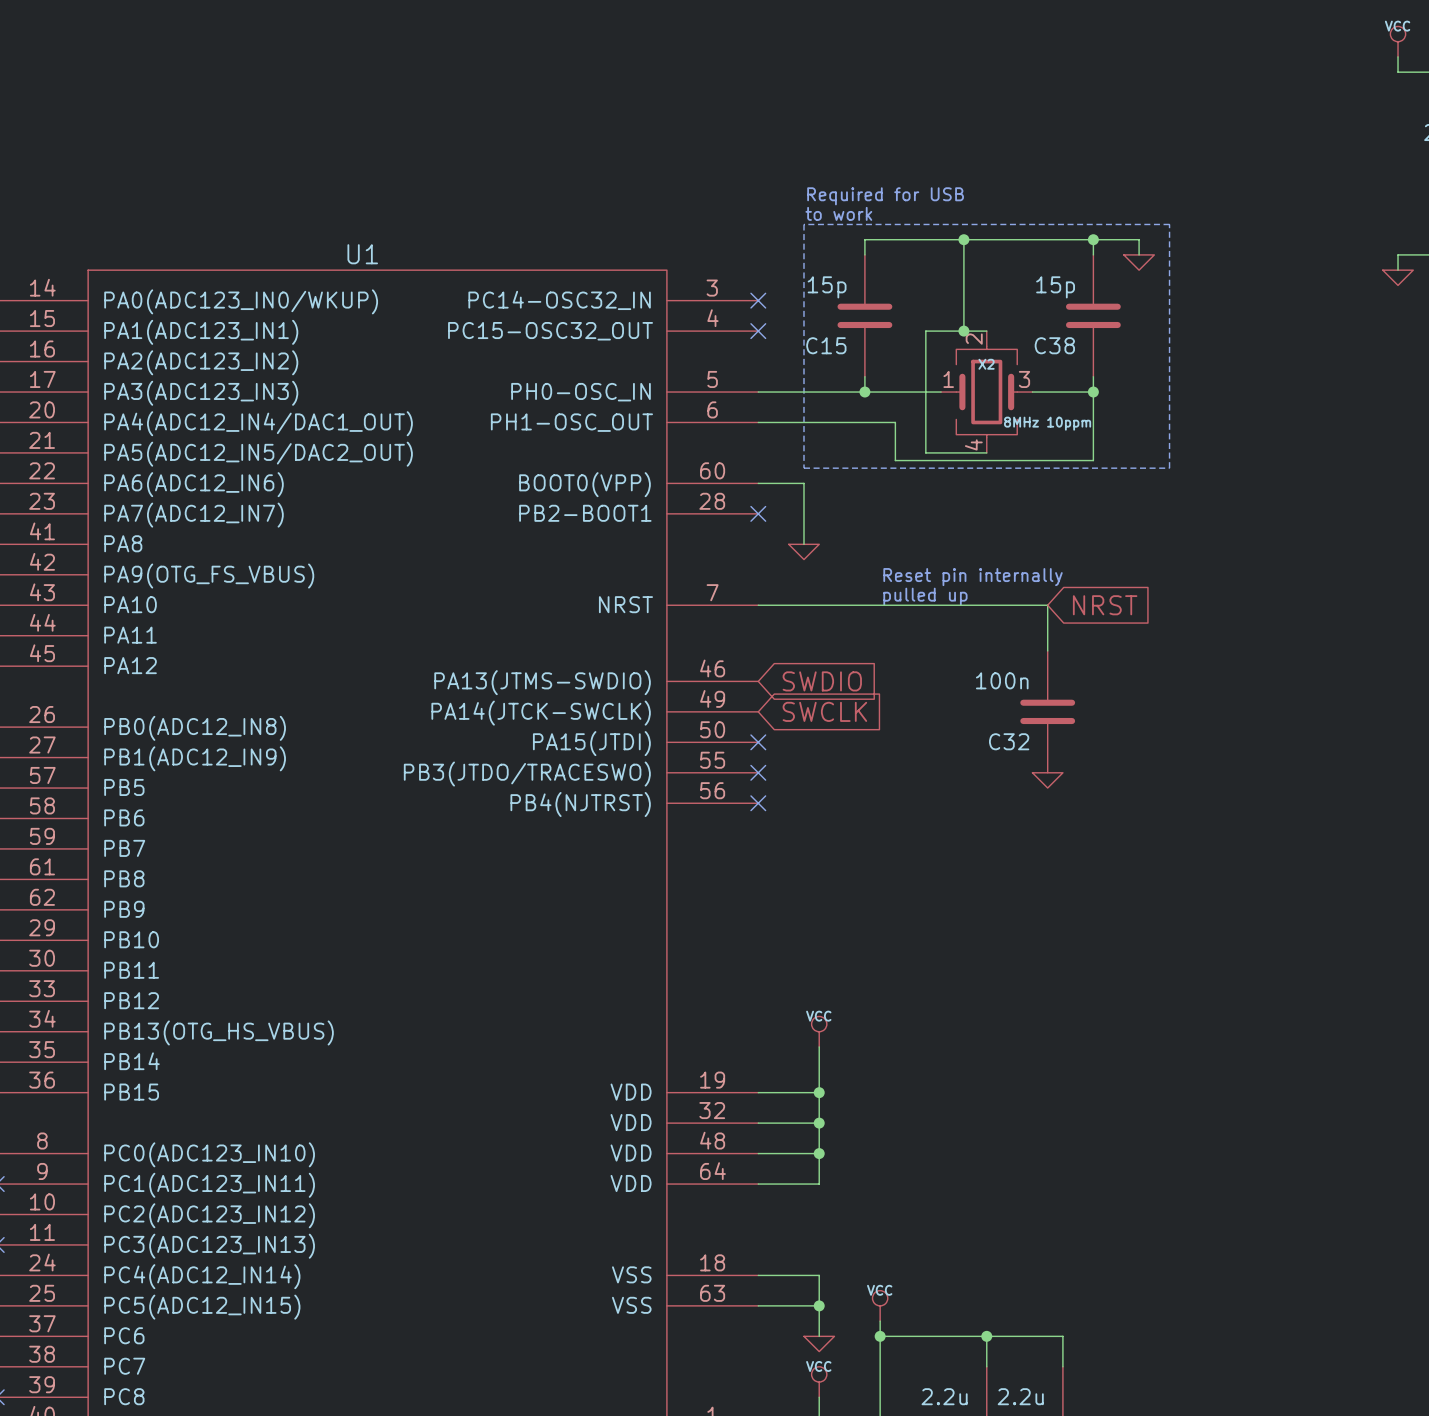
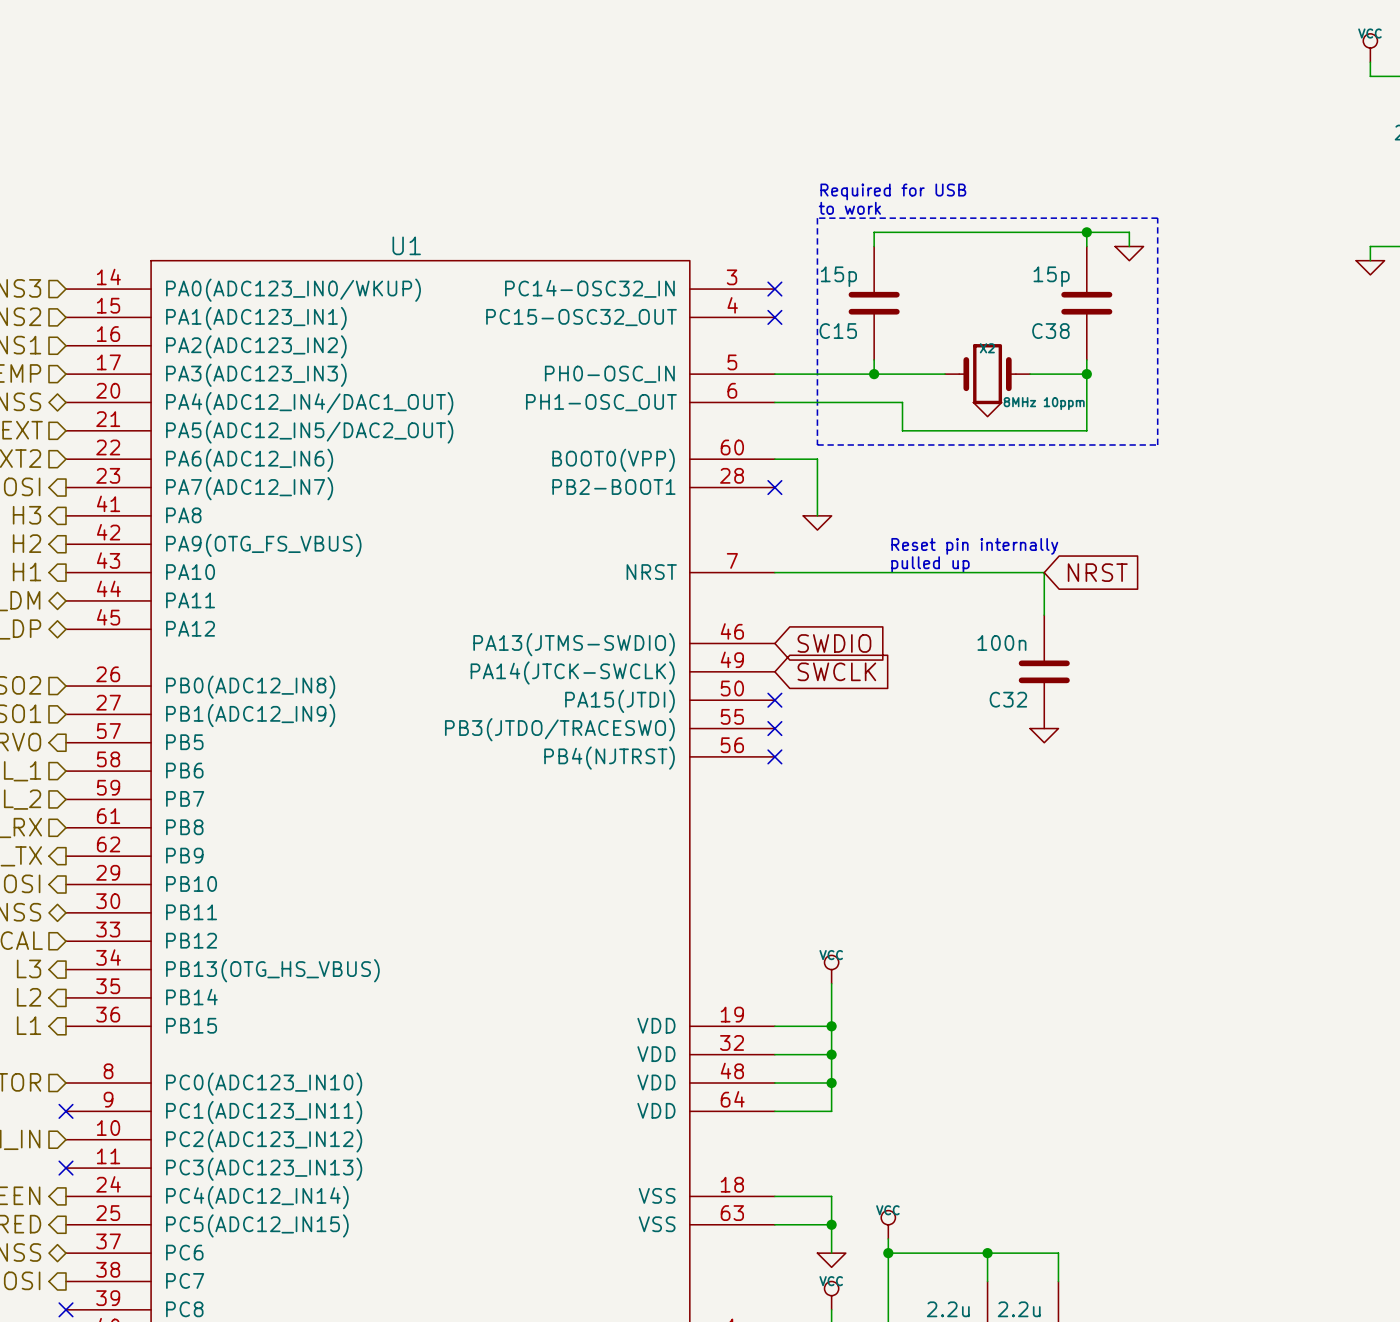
wire: (963, 239) (963, 331) -> none
junction: (963, 239) -> none
X2 symbol: [941, 331, 1033, 453] -> [945, 344, 1031, 405]
junction: (963, 331) -> none
wire: (986, 331) (925, 331) (925, 452) -> (902, 430) (930, 430)
power symbol: none -> (987, 409)
wire: (895, 452) (895, 460) (1093, 460) (1093, 452) -> (987, 430) (1086, 430)

